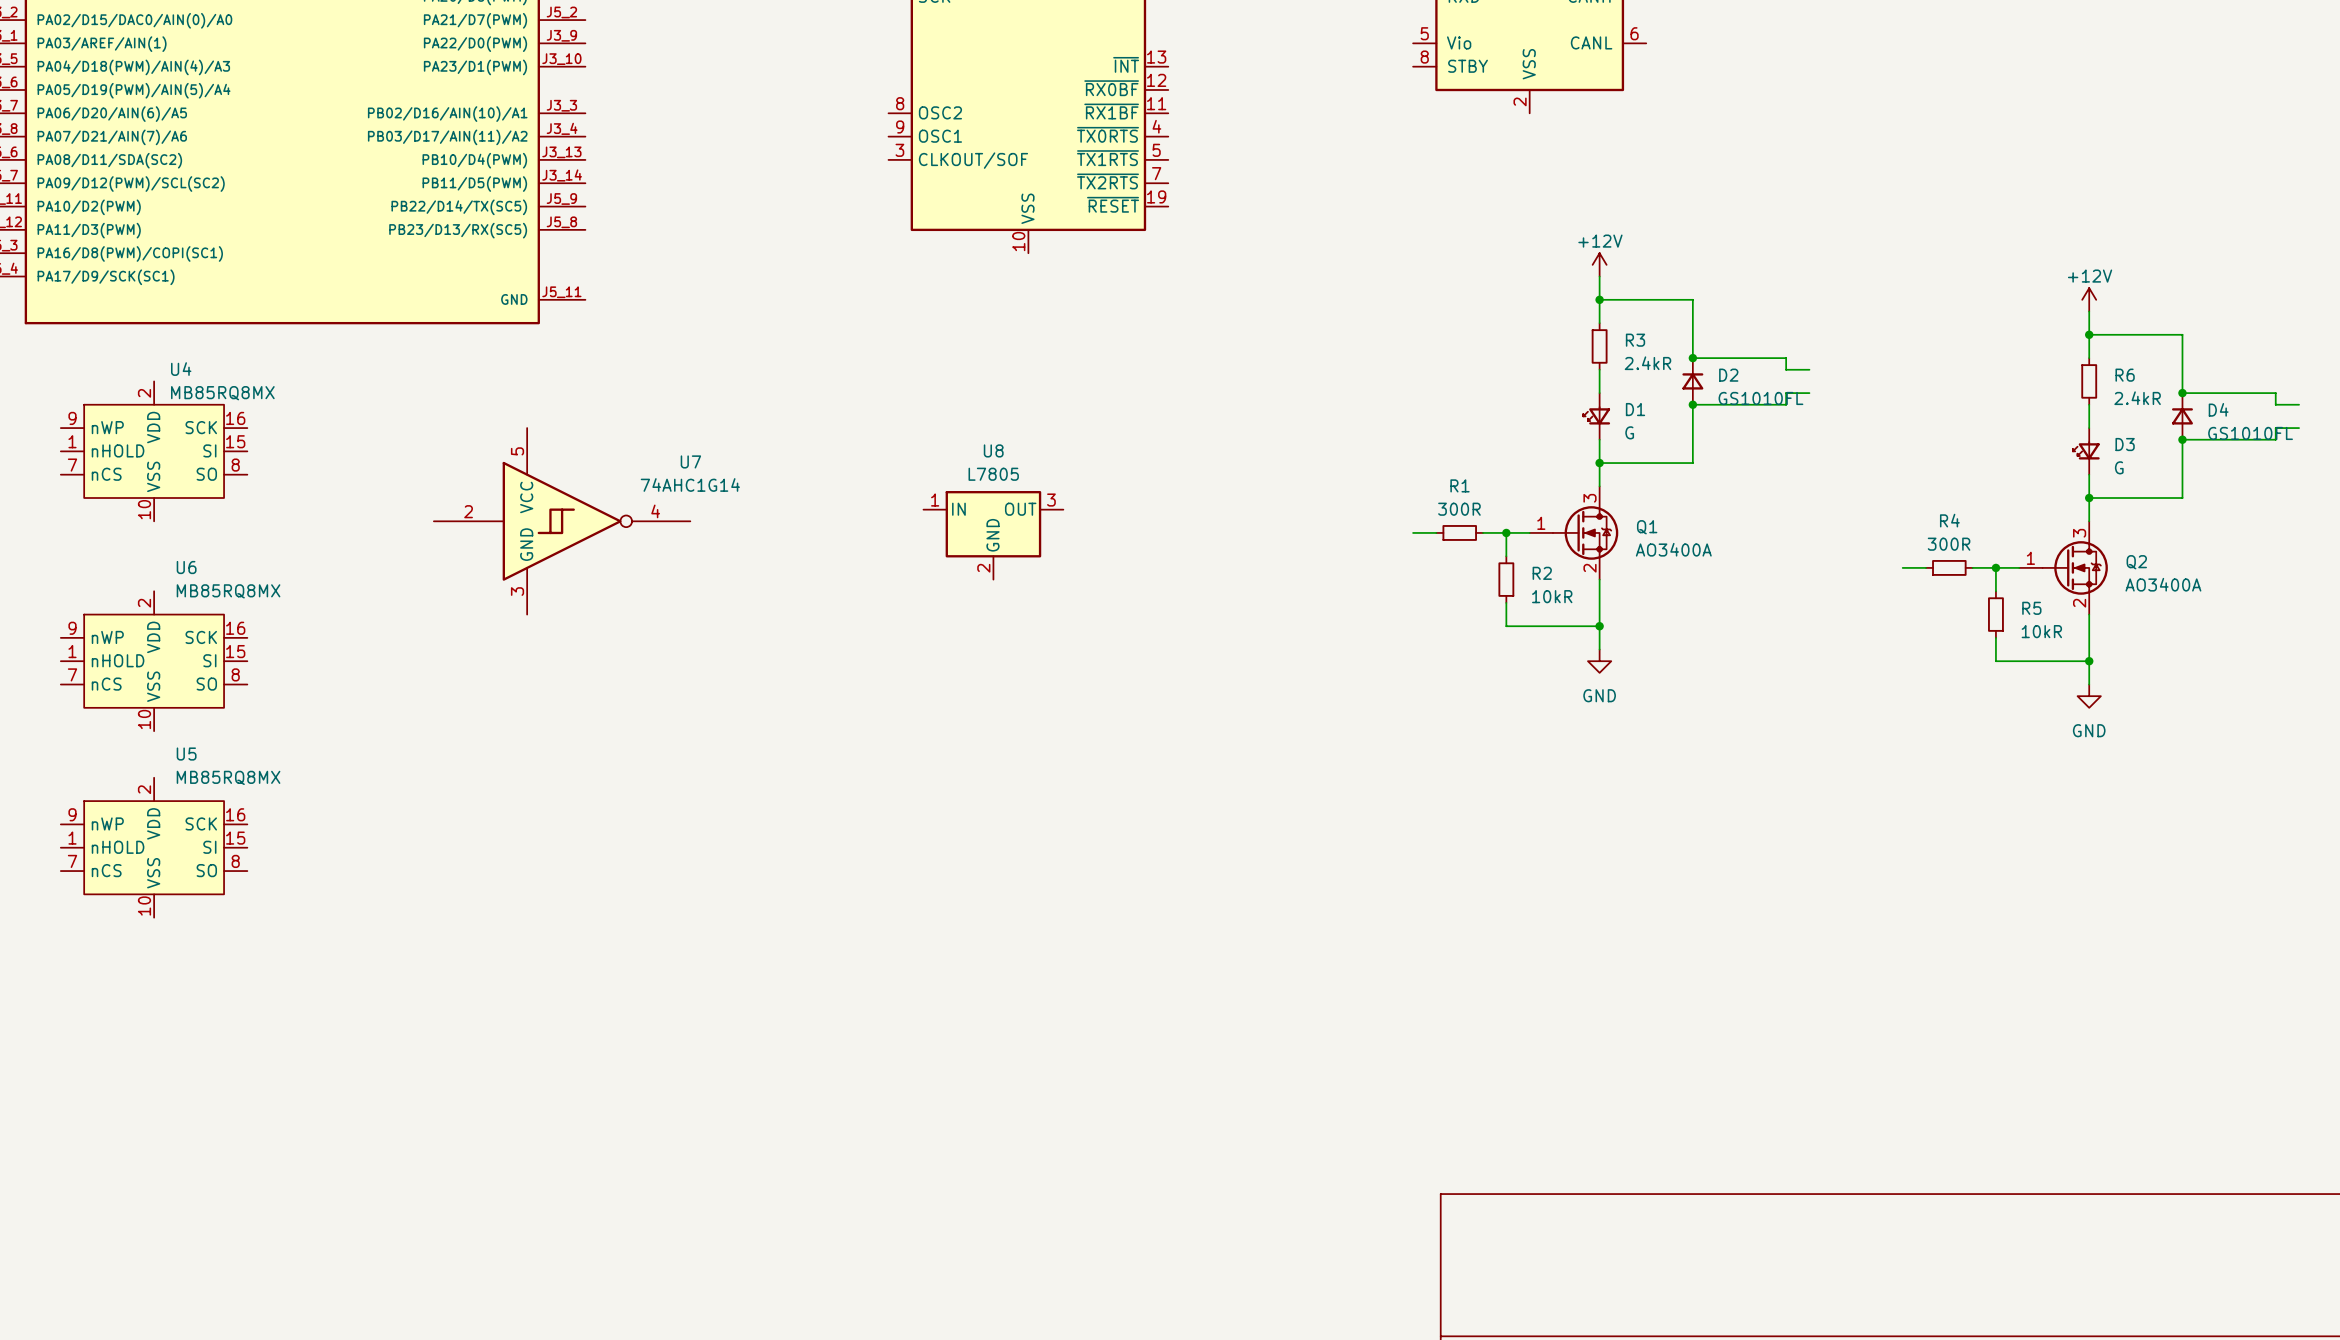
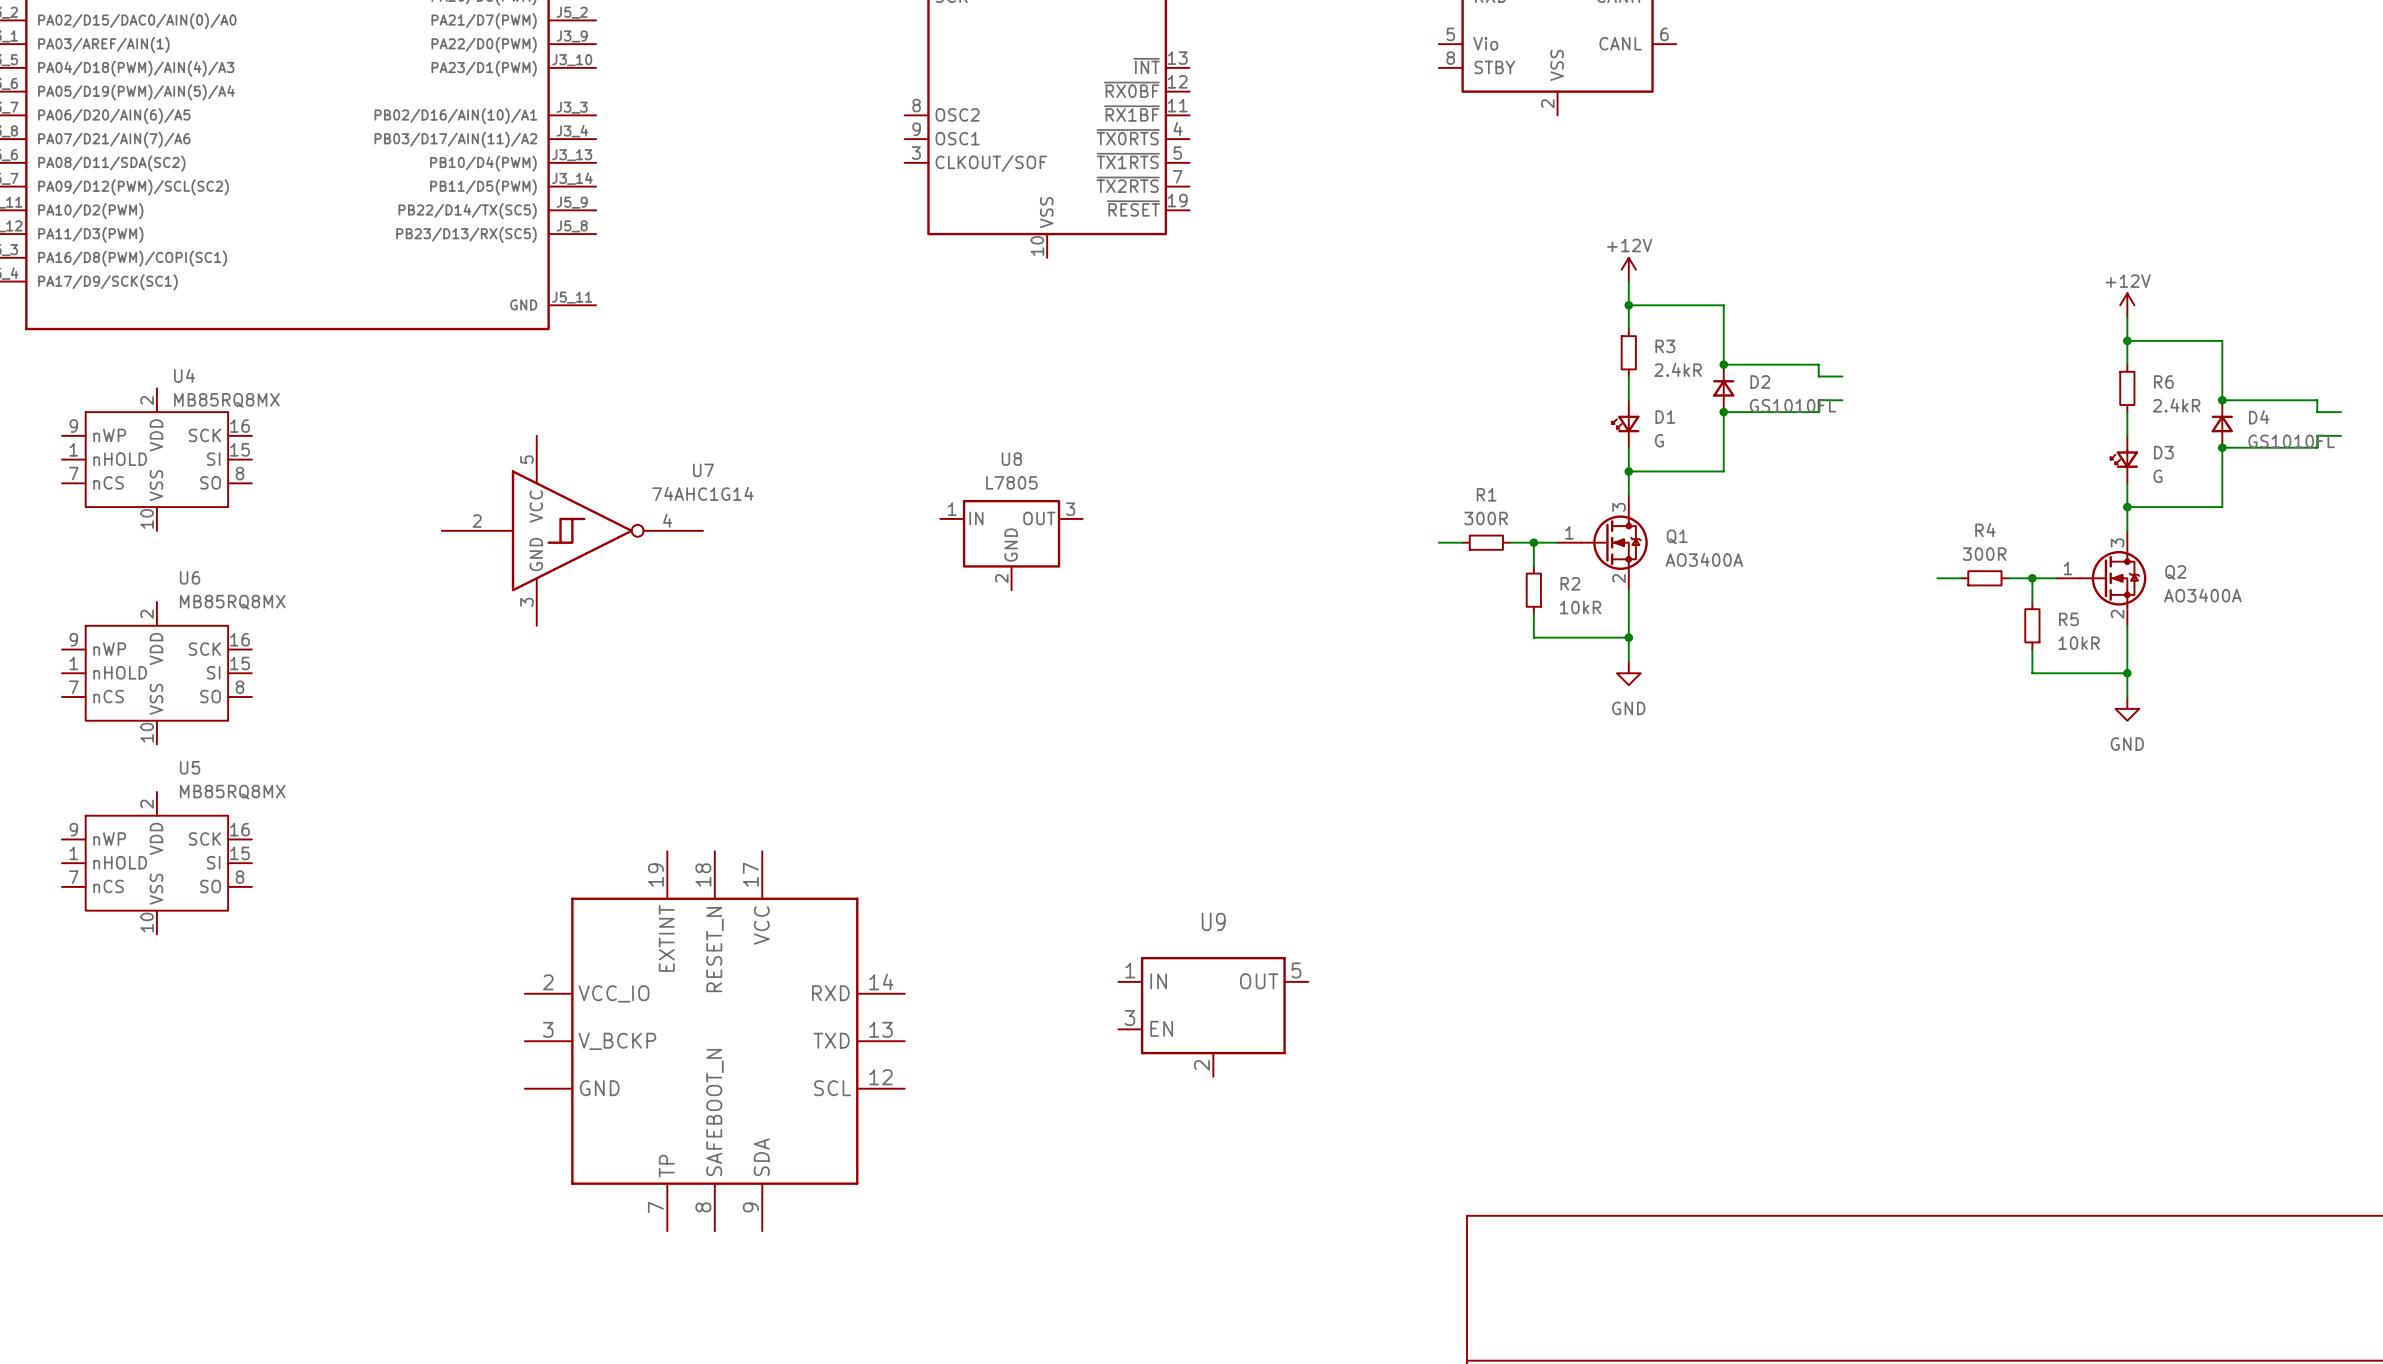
U9: none -> (1213, 1016)
part: none -> (714, 1041)

